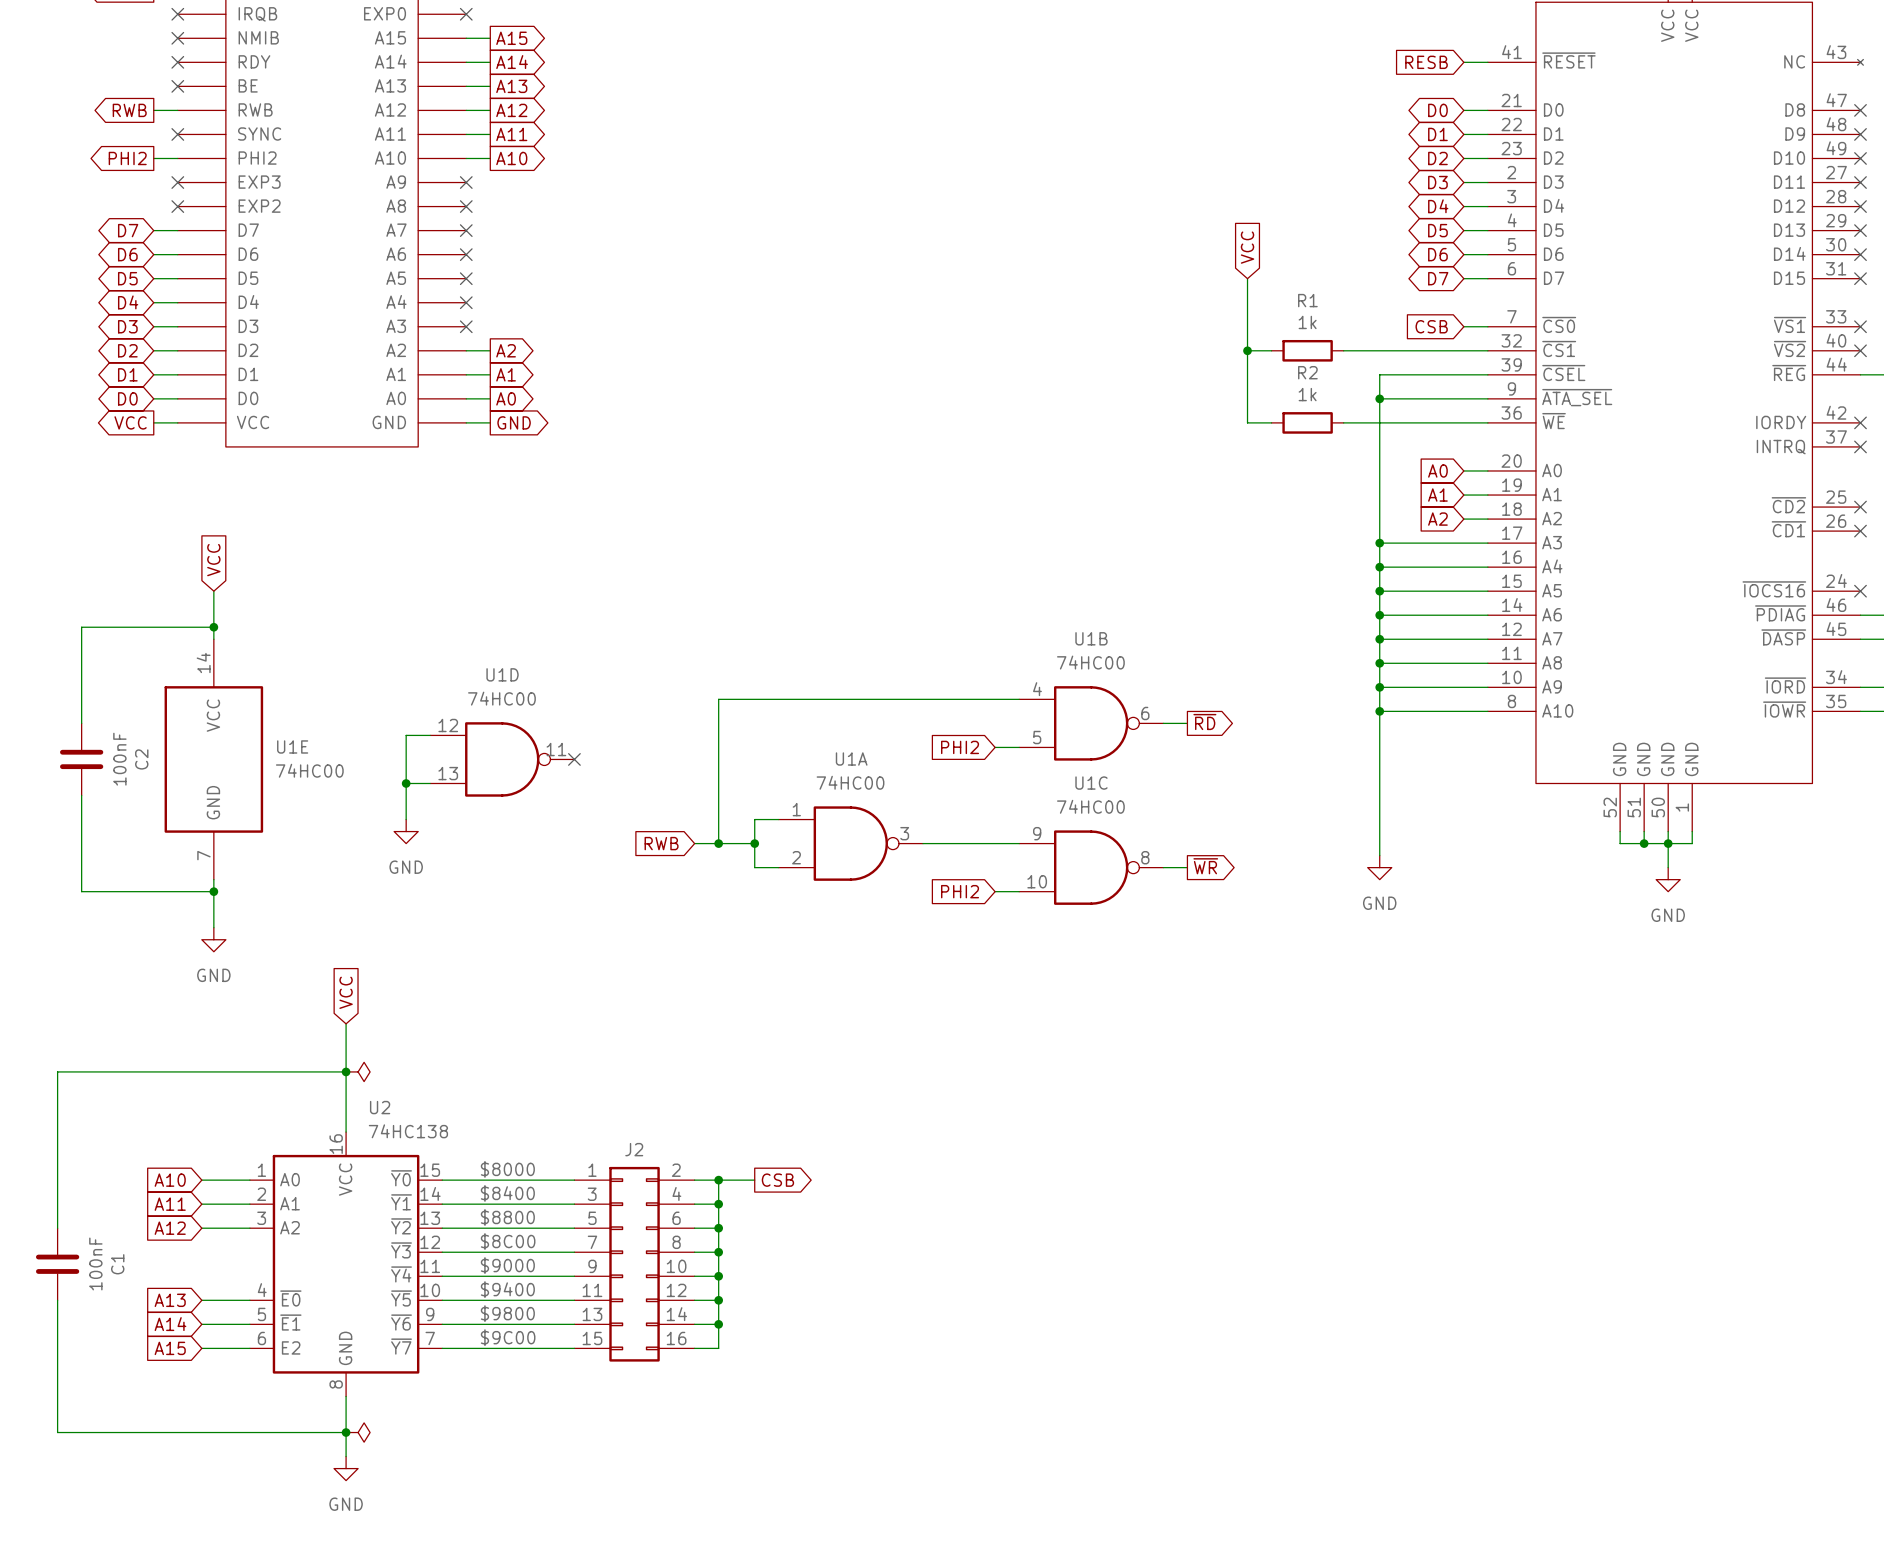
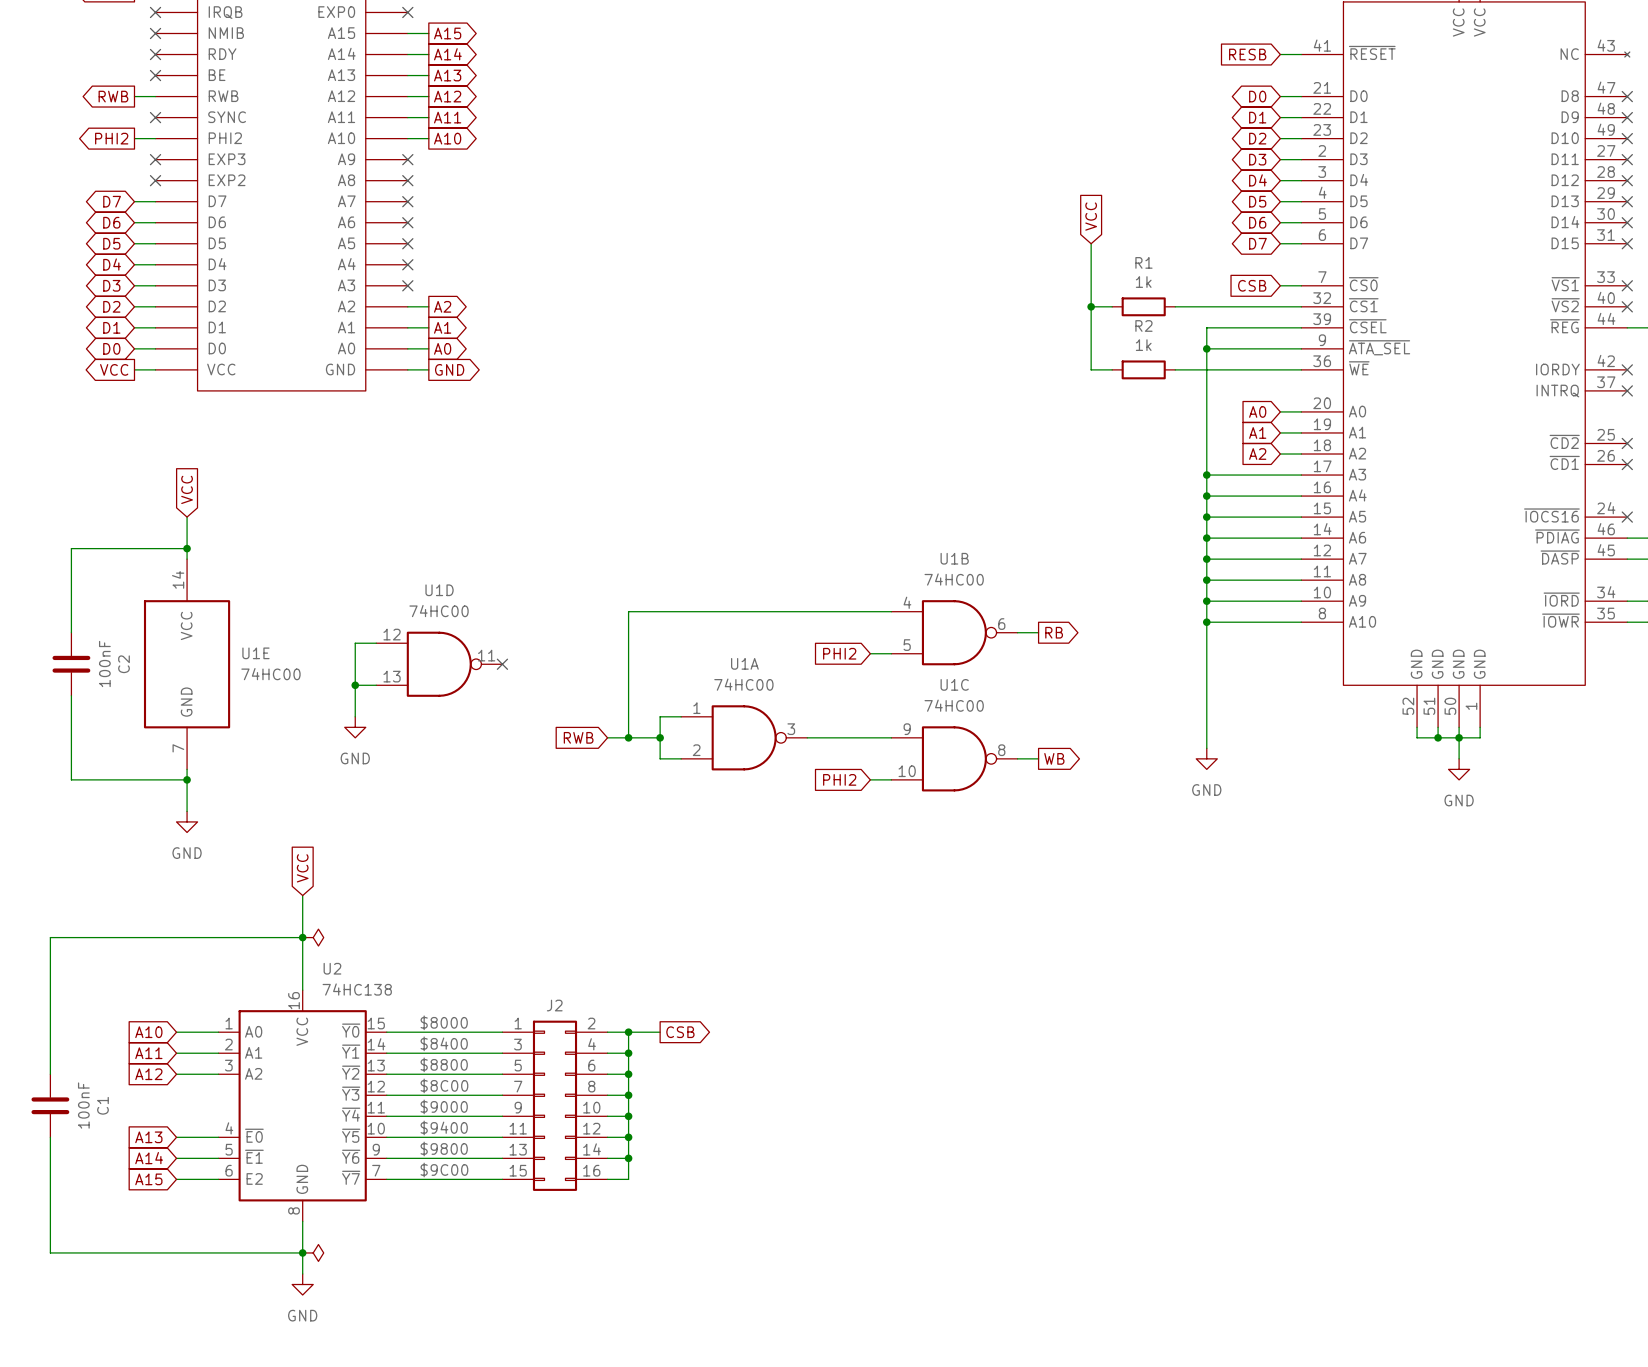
global label: ~{RD} (1204, 722) -> RB (1054, 632)
global label: ~{WR} (1205, 866) -> WB (1054, 758)

